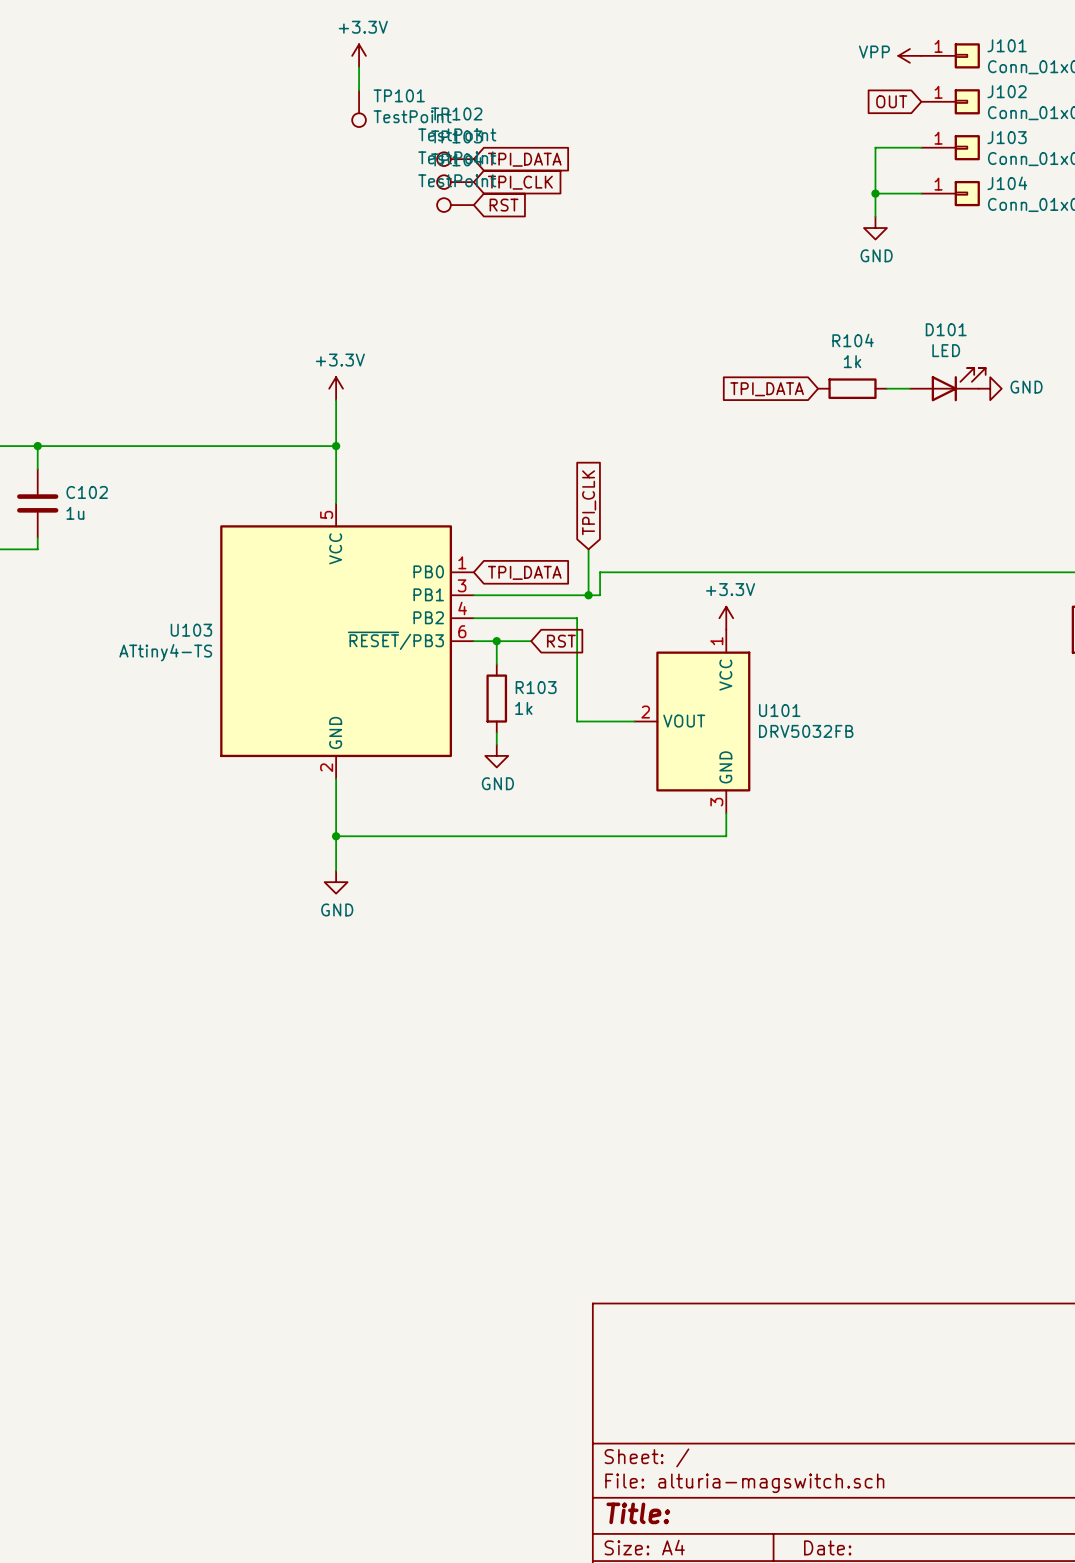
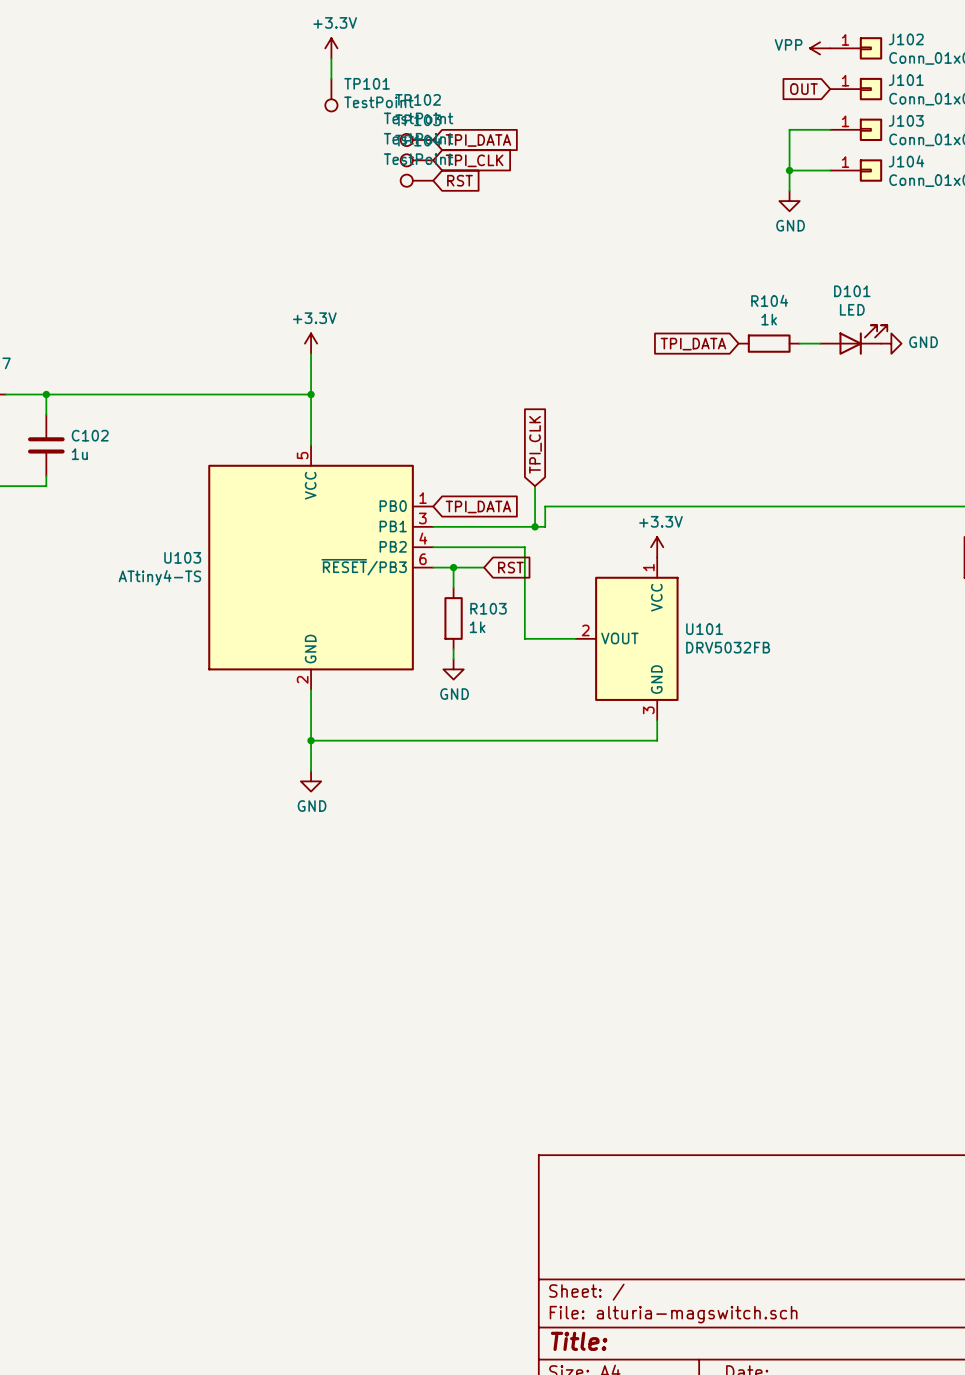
J101 name: J101 (1007, 45) -> J102 (906, 39)
J102 name: J102 (1007, 91) -> J101 (906, 80)

